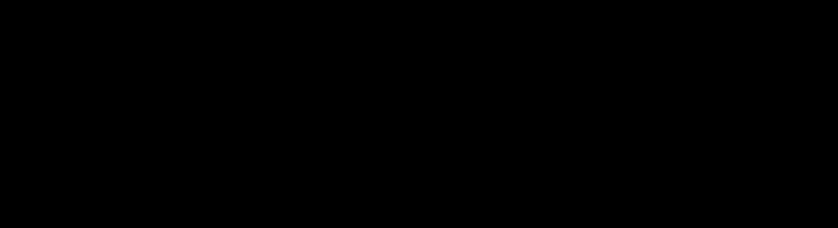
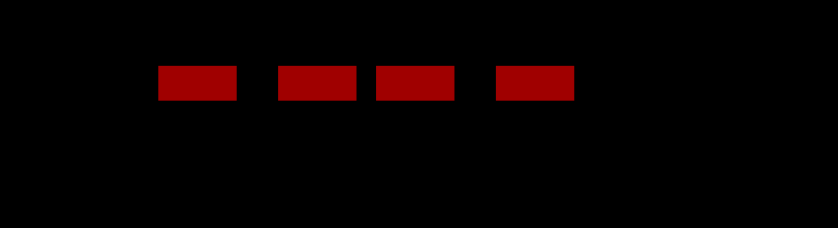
part: none -> (257, 83)
part: none -> (475, 83)

